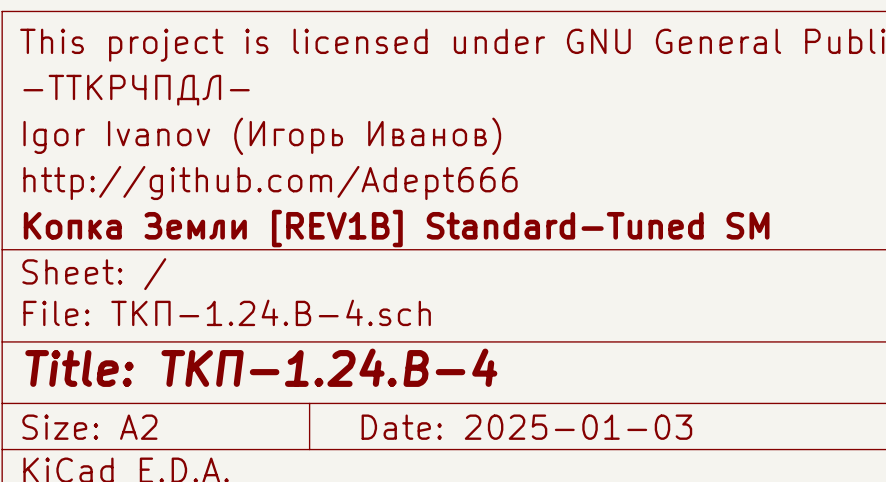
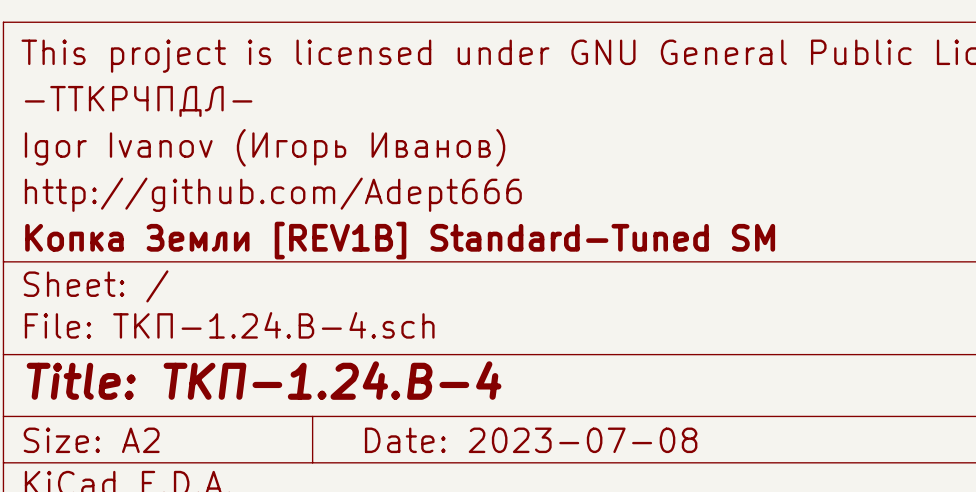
title block: Date: 2025-01-03 (526, 427) -> Date: 2023-07-08 (531, 440)

